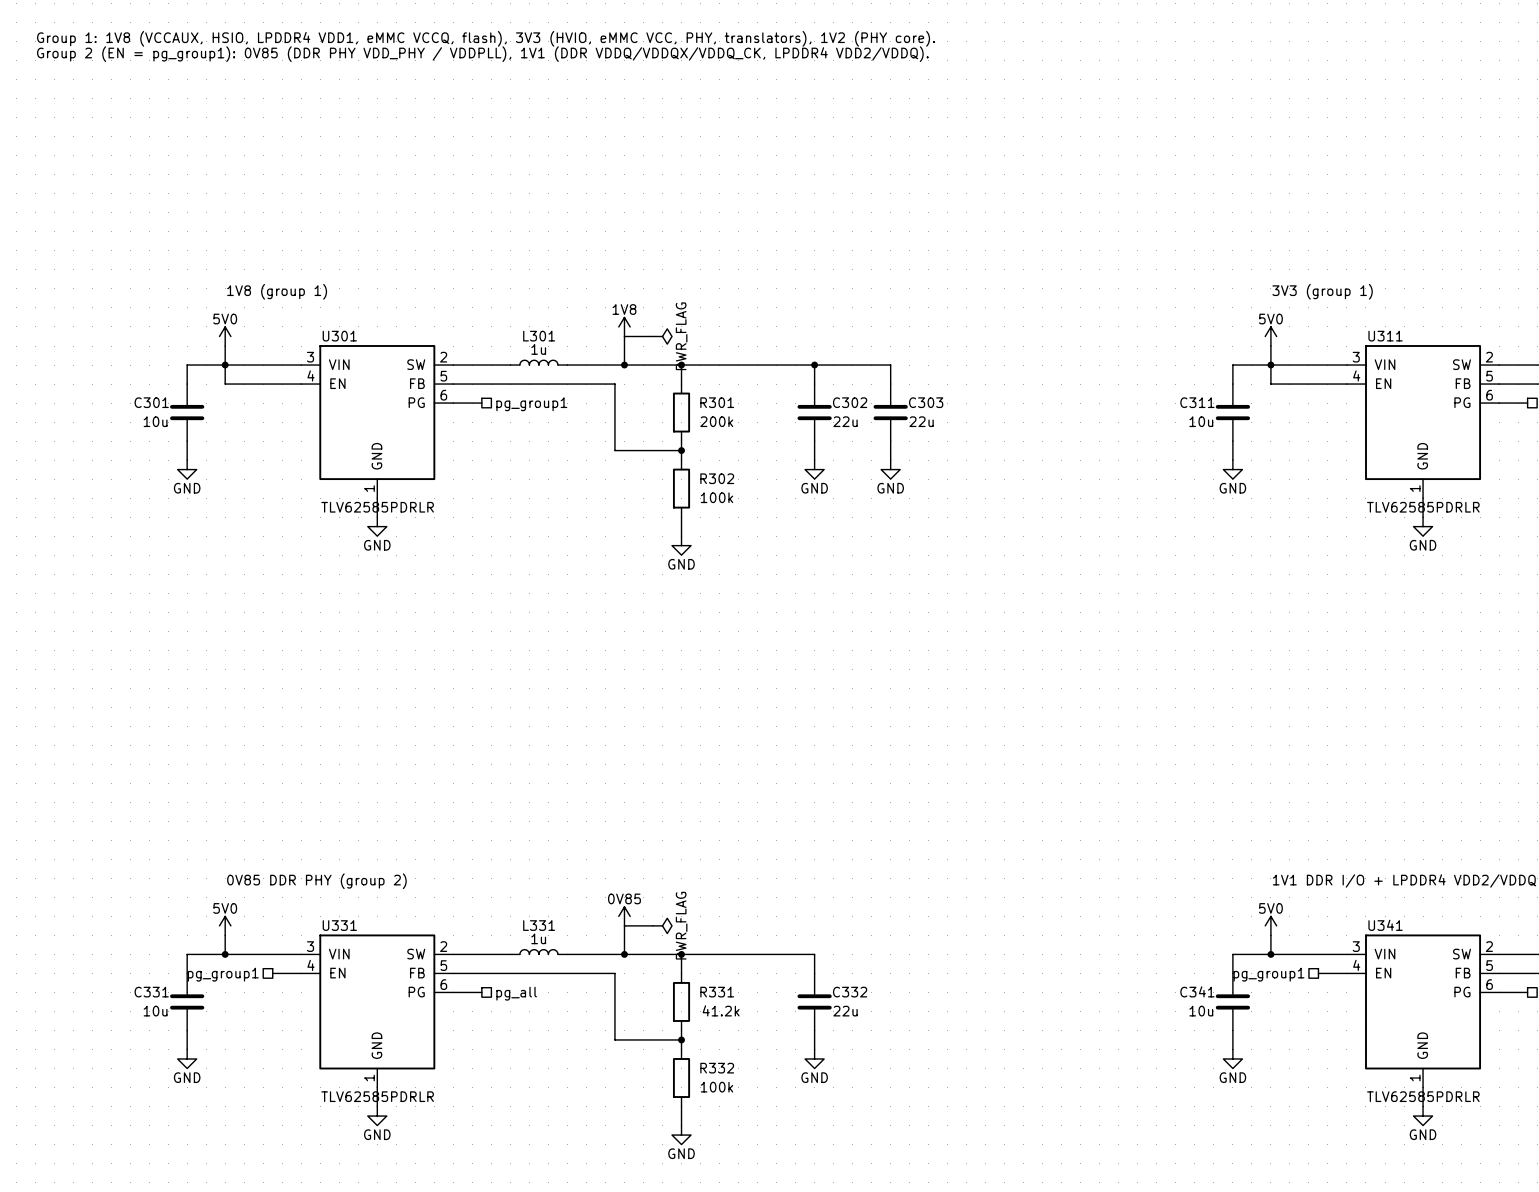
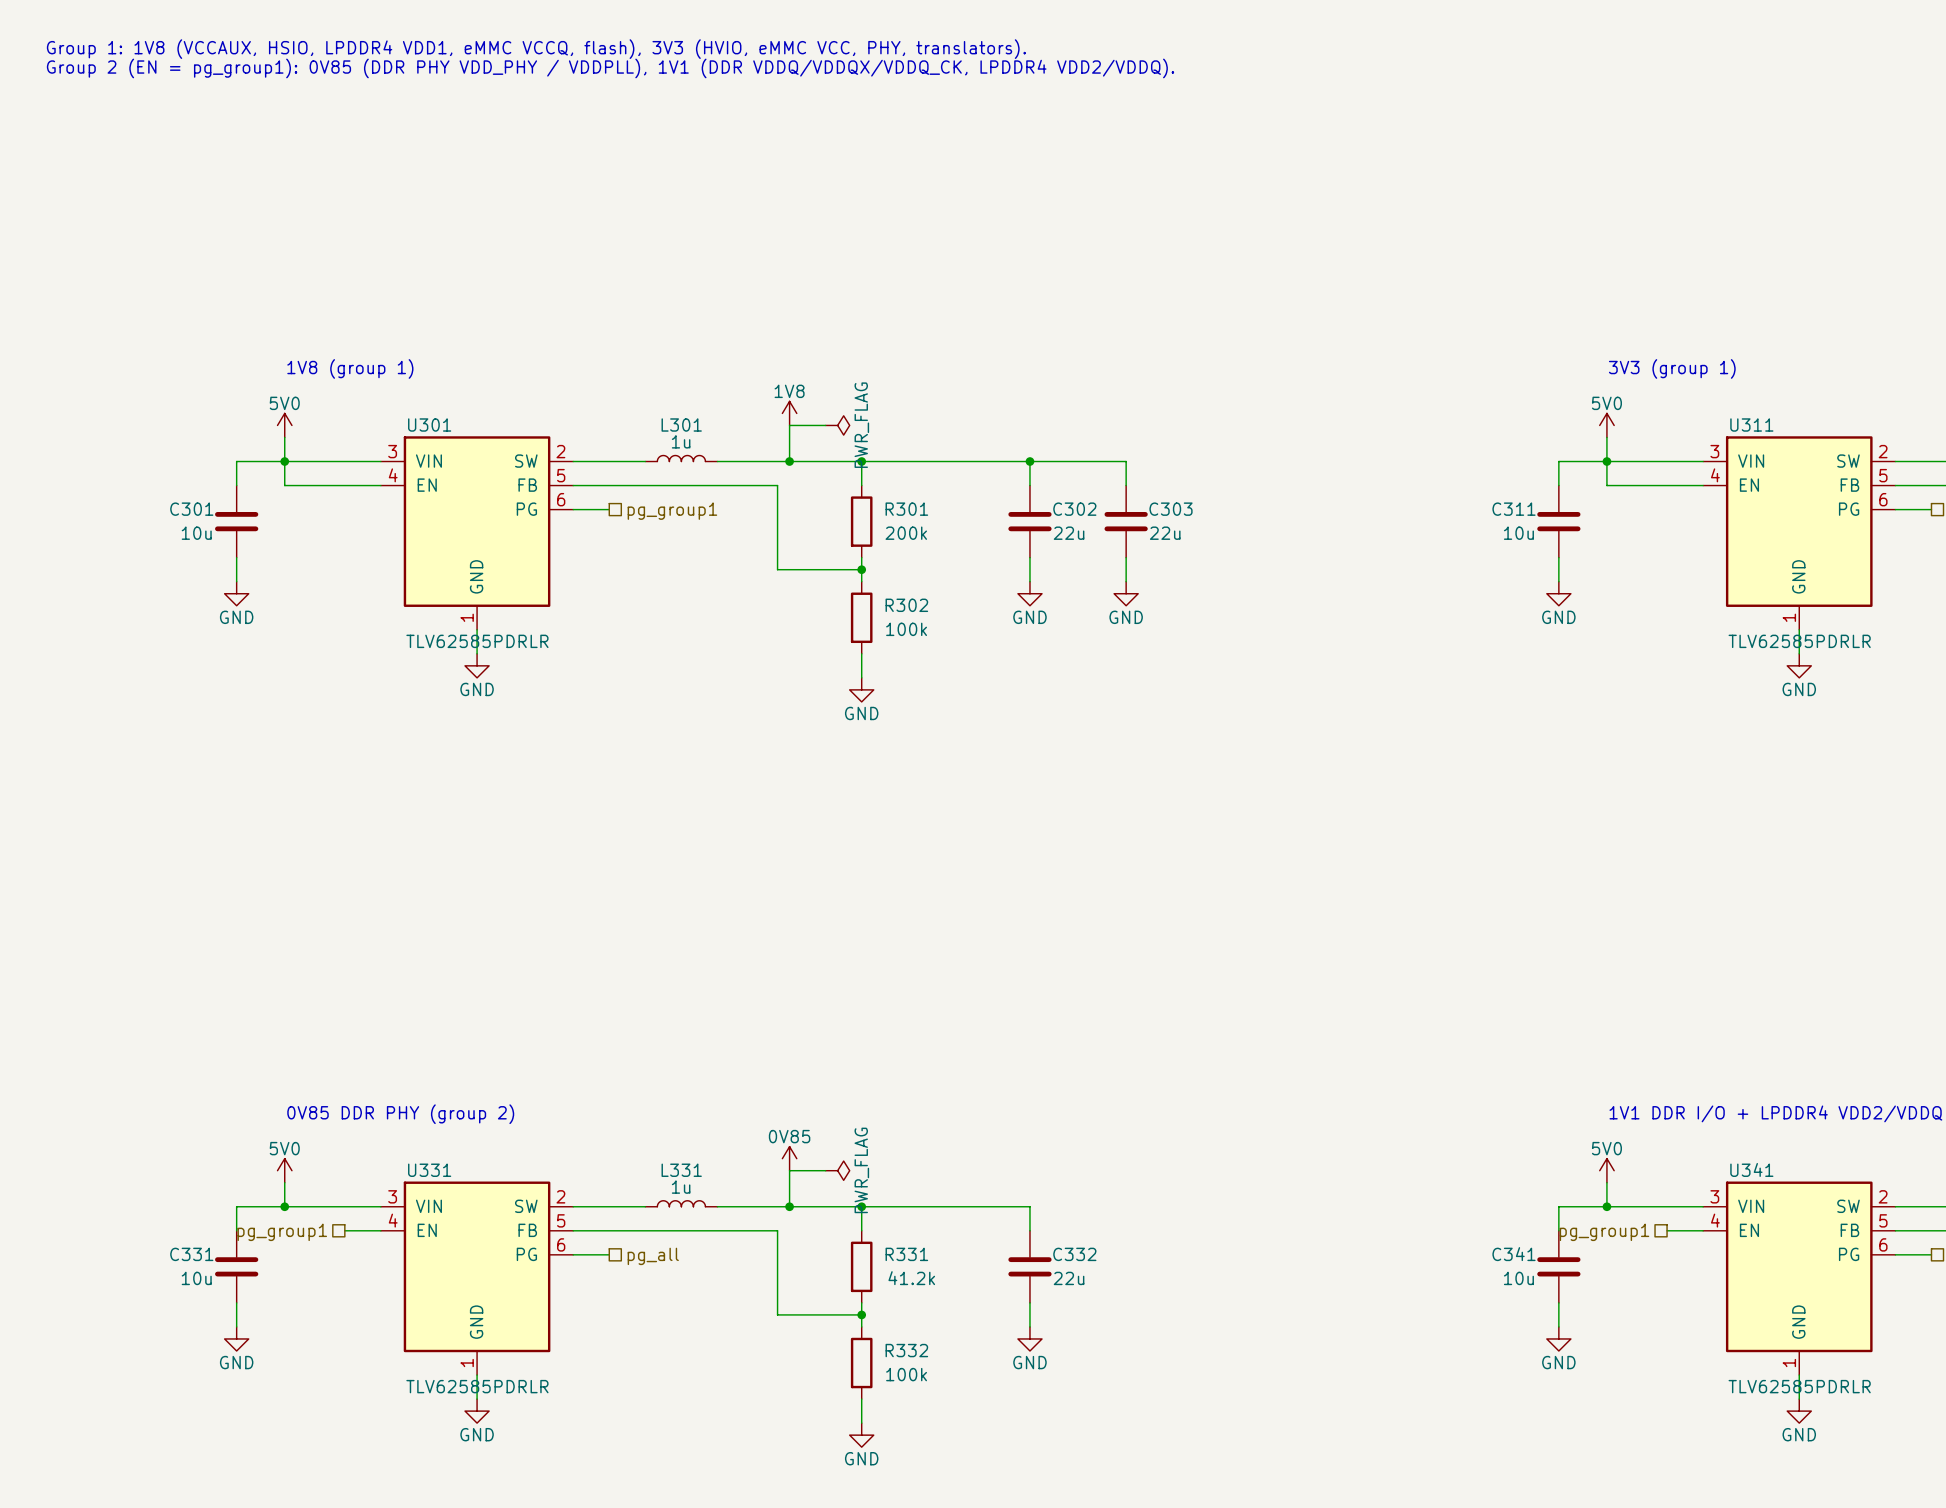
text: Group 1: 1V8 (VCCAUX, HSIO, LPDDR4 VDD1, eMMC VCCQ, flash), 3V3 (HVIO, eMMC VCC, PHY, translators), 1V2 (PHY core). (486, 38) -> Group 1: 1V8 (VCCAUX, HSIO, LPDDR4 VDD1, eMMC VCCQ, flash), 3V3 (HVIO, eMMC VCC, PHY, translators). (536, 49)

